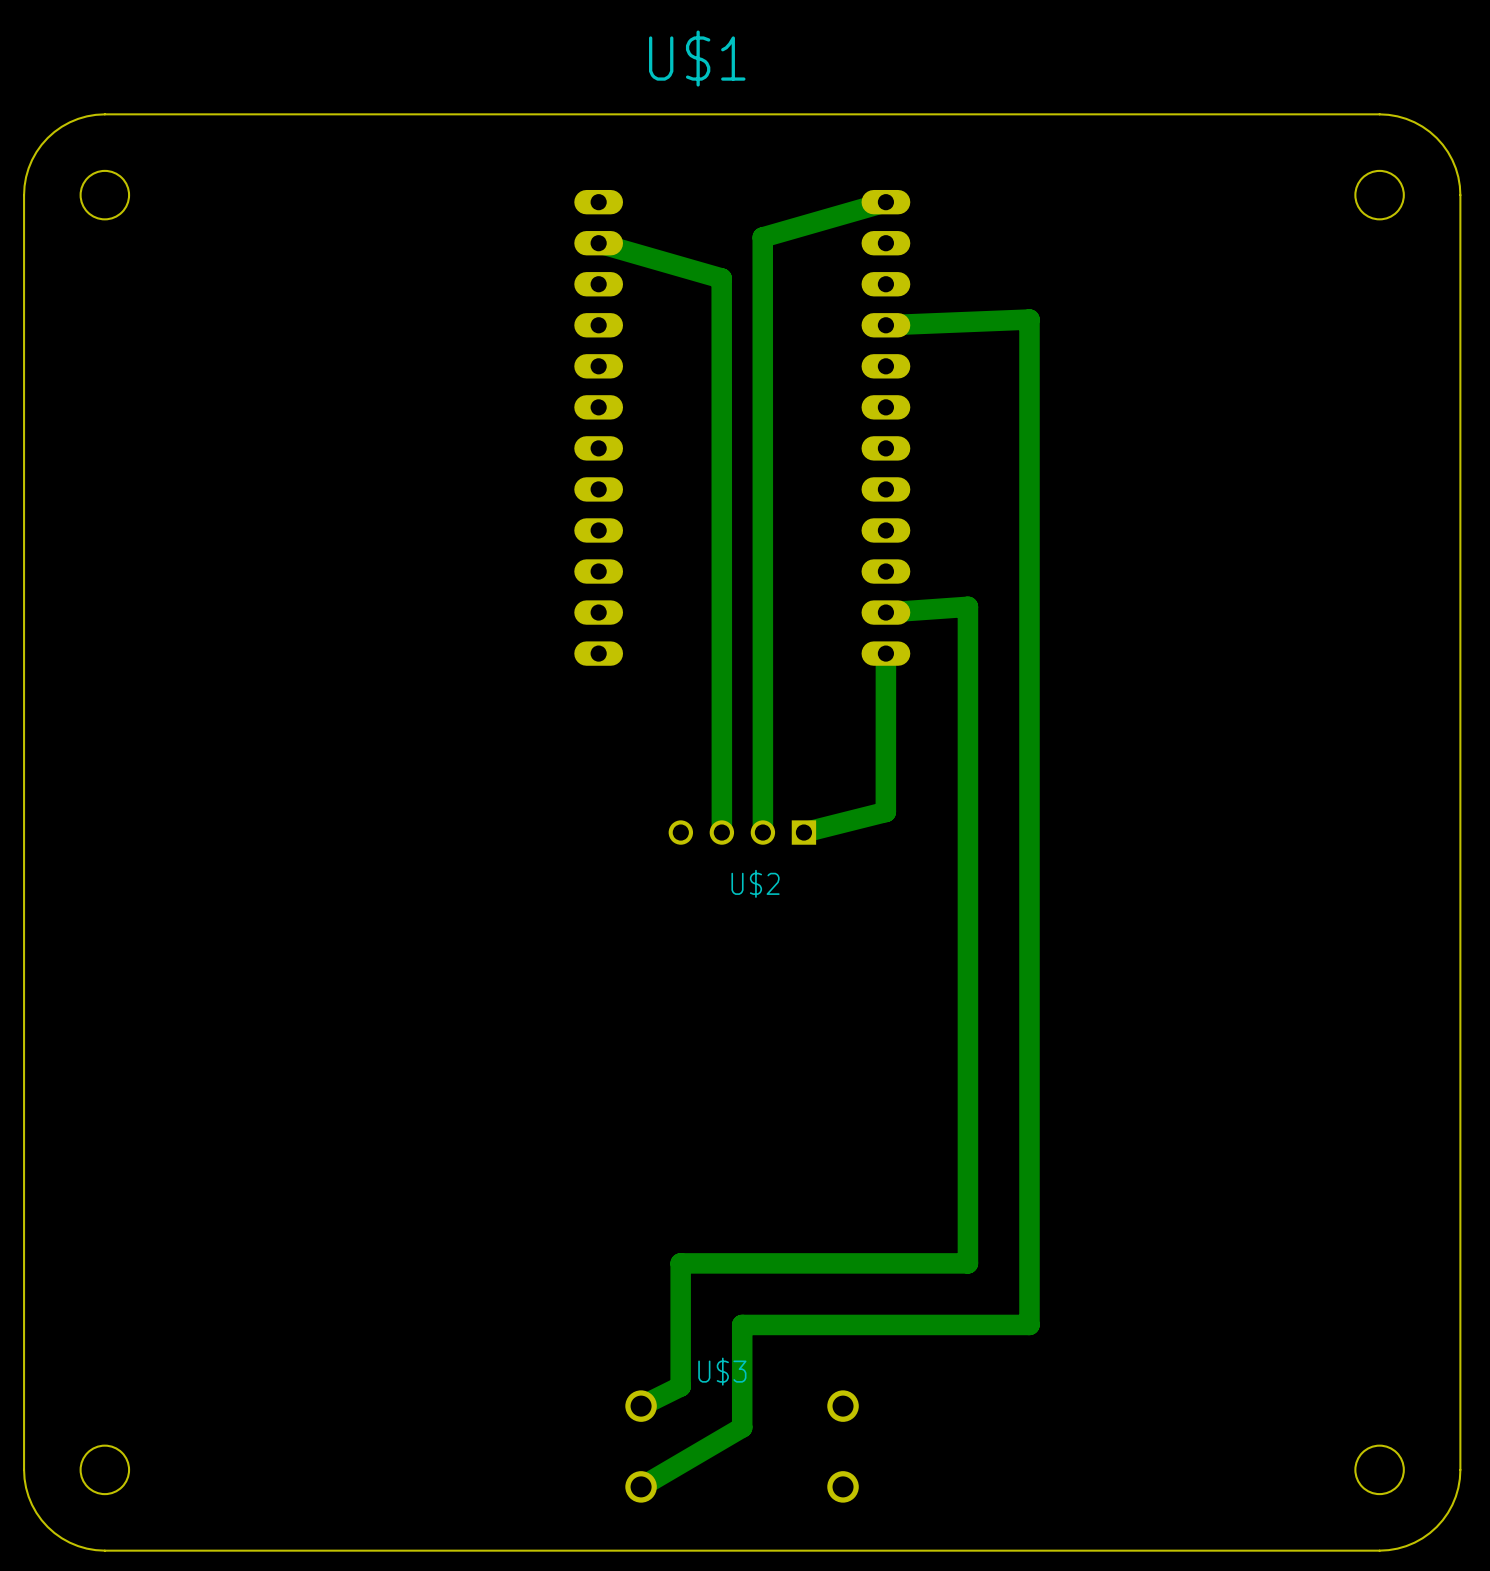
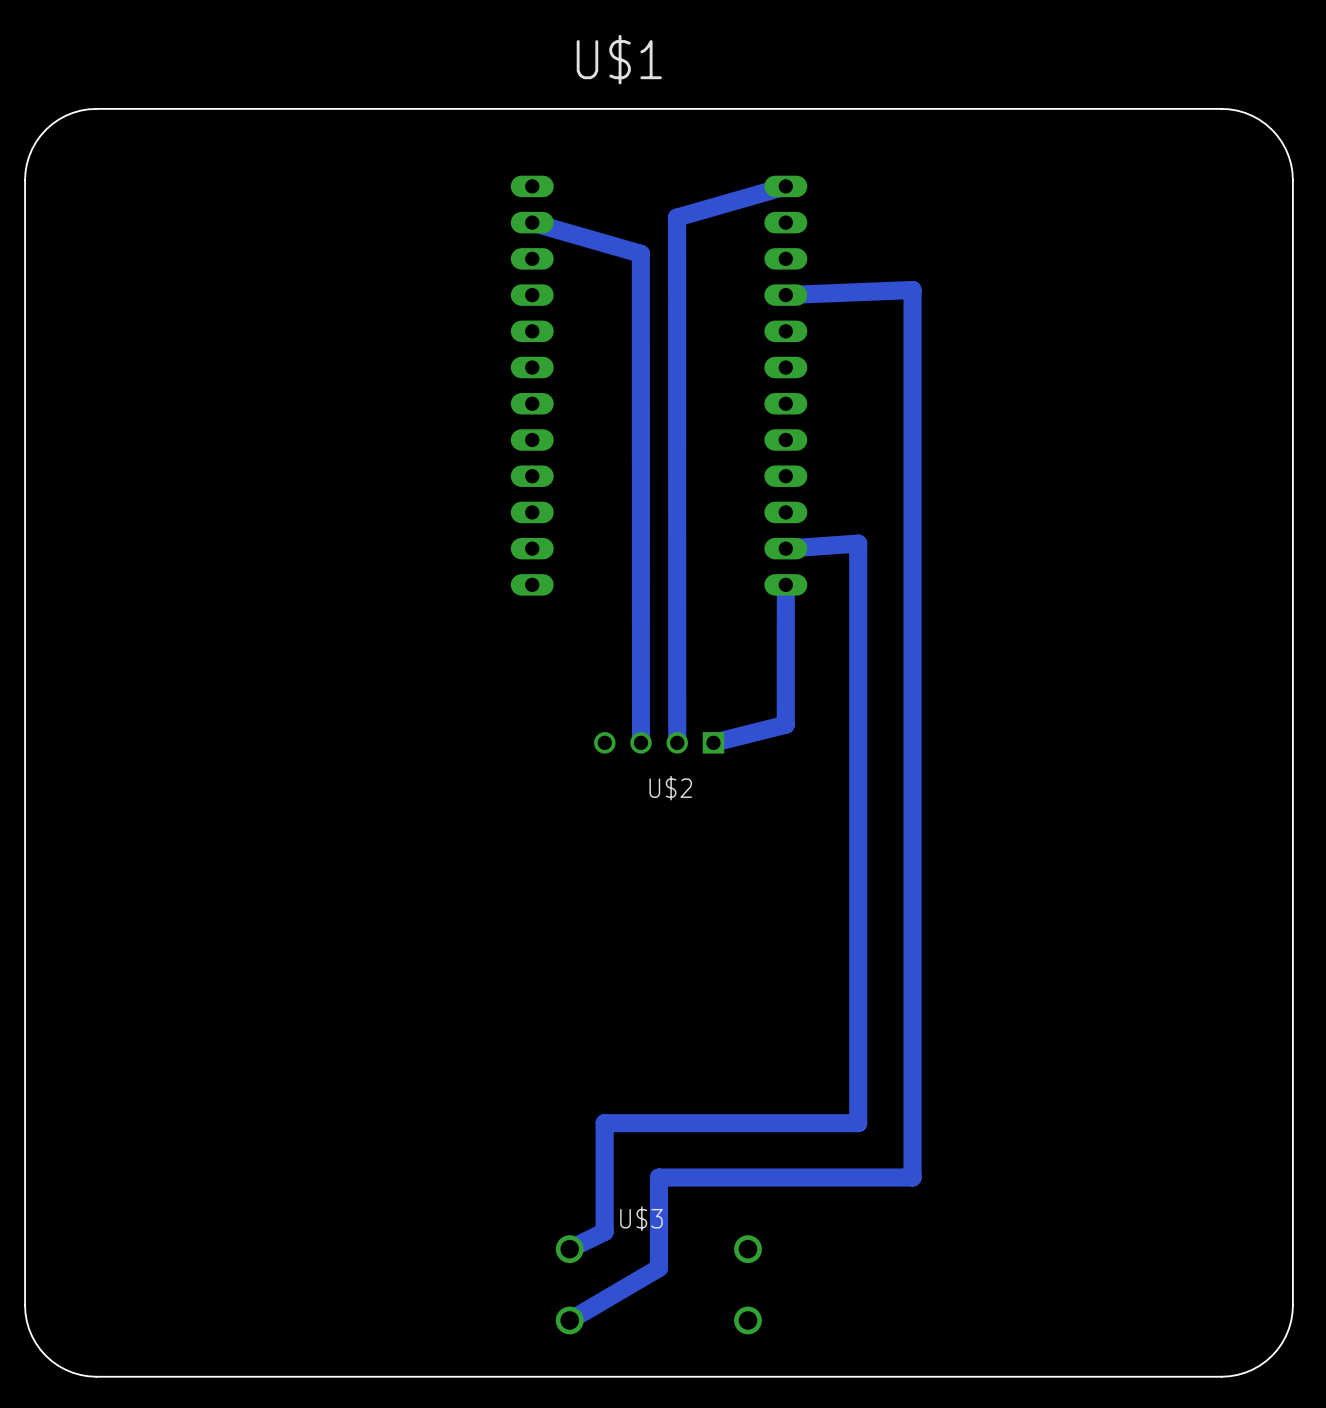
round board edge: [79, 169, 131, 221] -> none
round board edge: [1354, 169, 1405, 221] -> none
round board edge: [79, 1444, 131, 1496] -> none
round board edge: [1354, 1444, 1405, 1496] -> none

